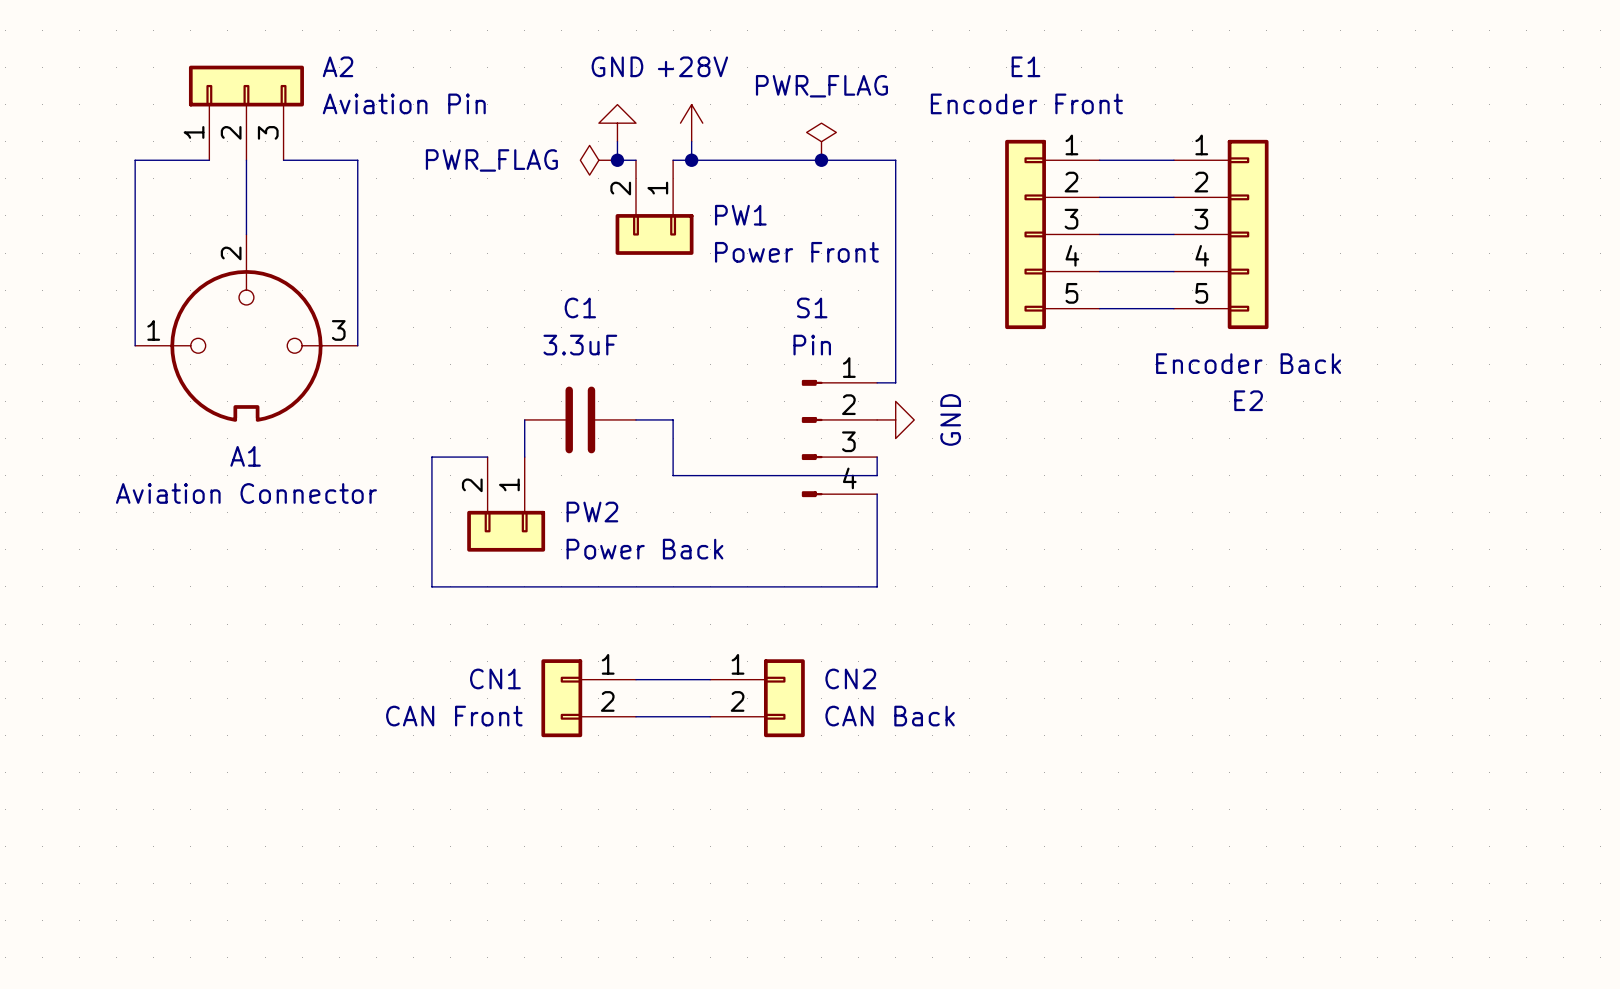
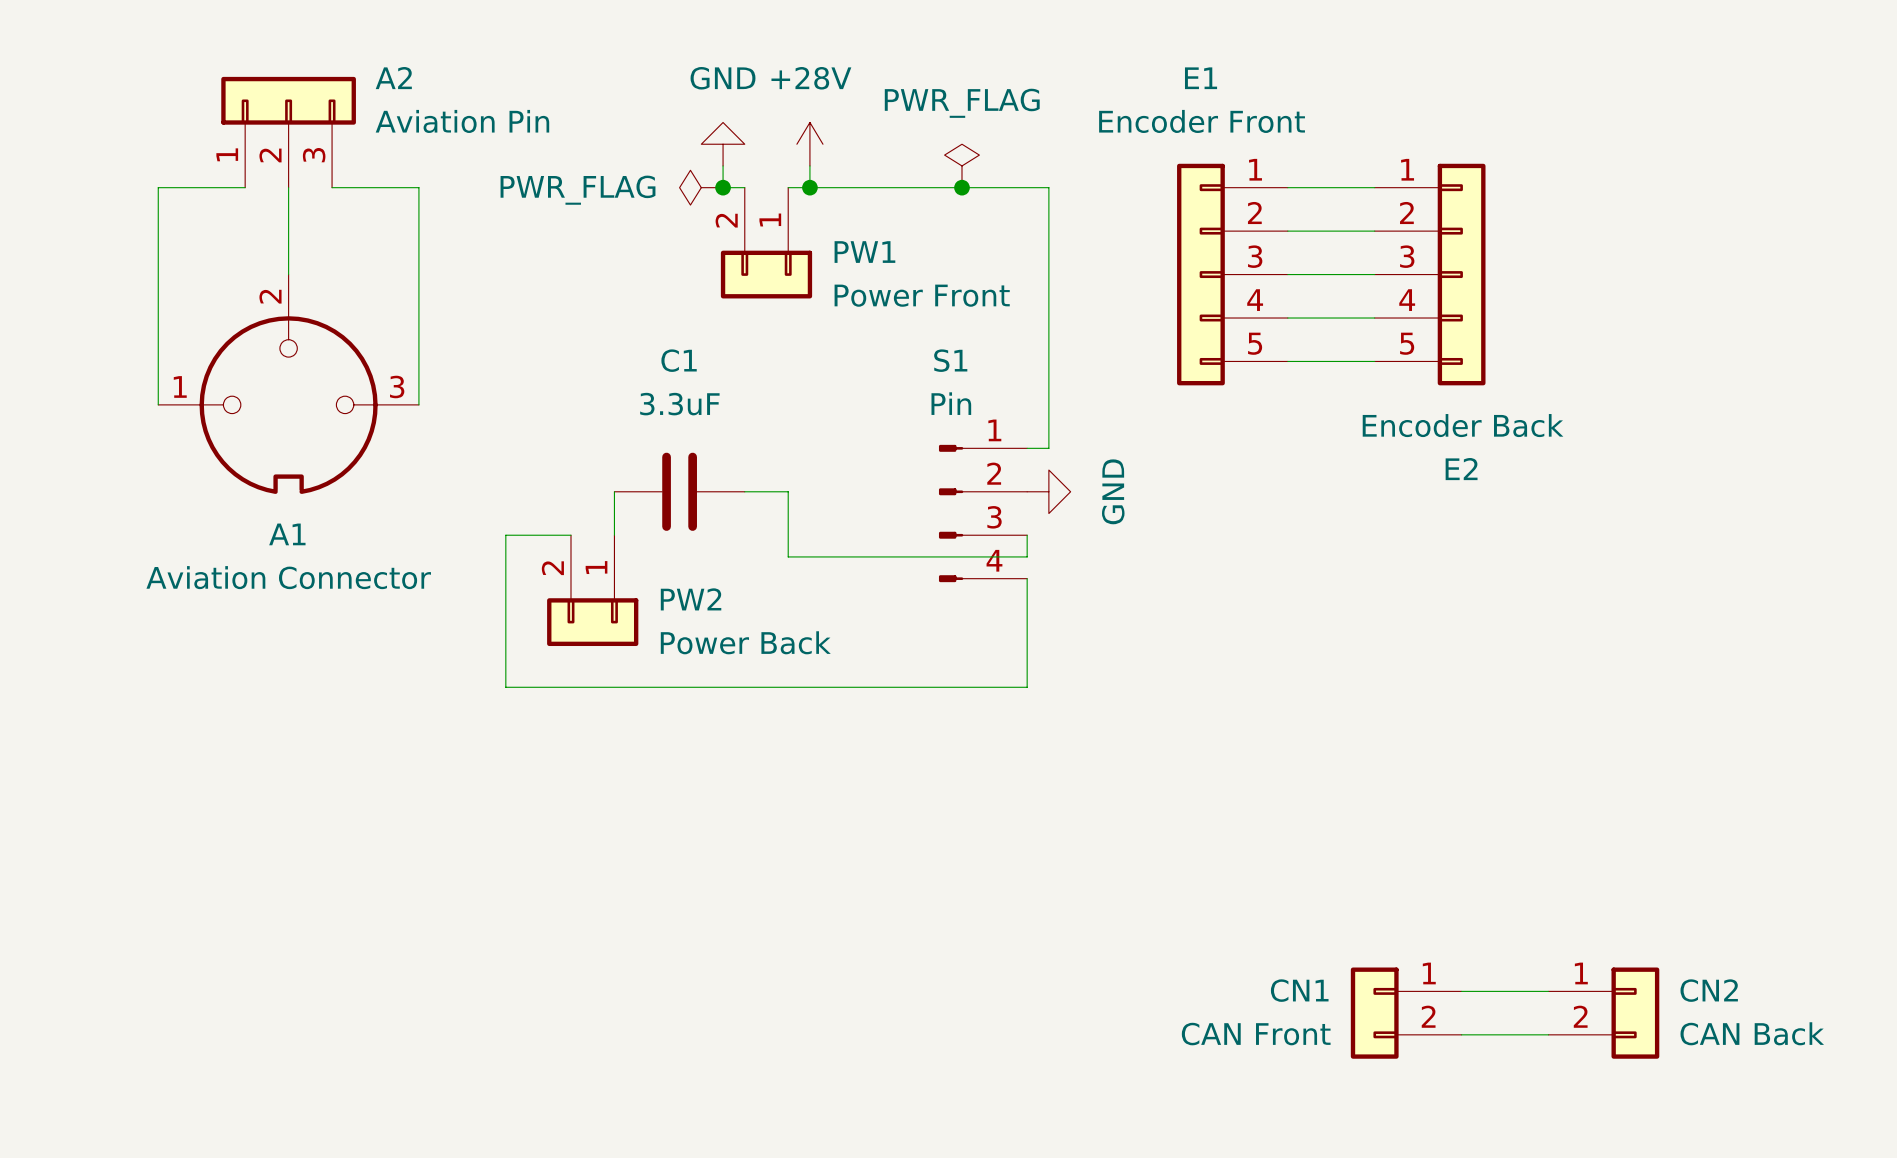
wire: (636, 679) (710, 679) -> none
CN1 position: (588, 698) -> (1406, 1013)
CN2 position: (757, 698) -> (1603, 1013)
wire: (636, 716) (710, 716) -> none
wire: none -> (1461, 991) (1548, 991)
wire: none -> (1461, 1034) (1548, 1034)

